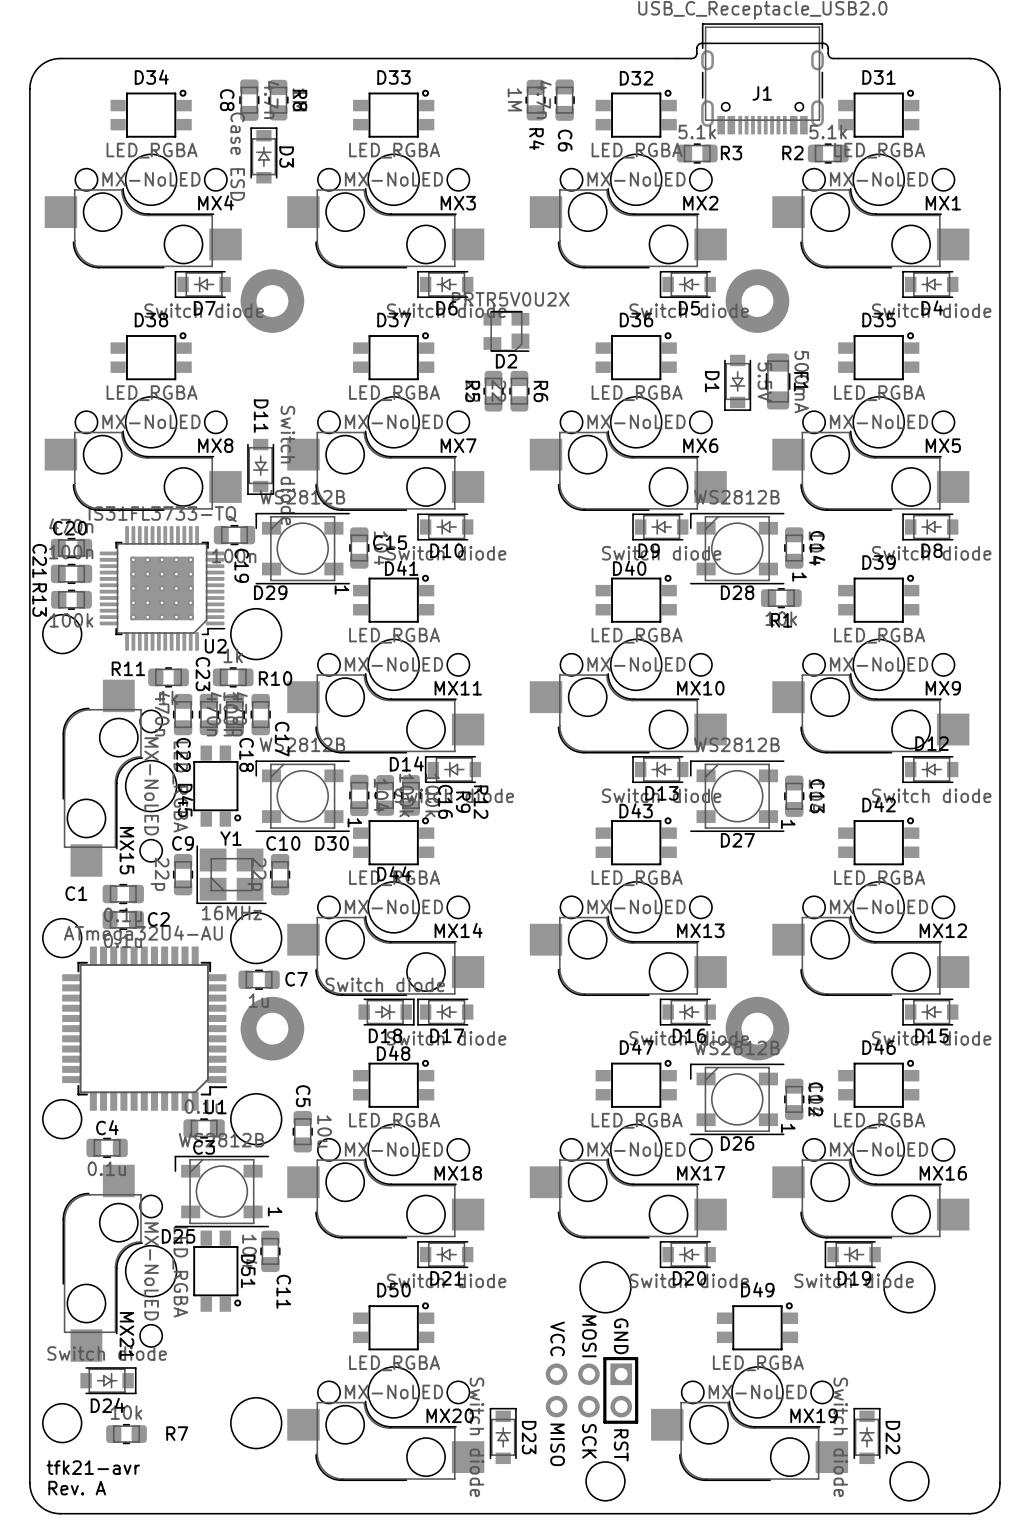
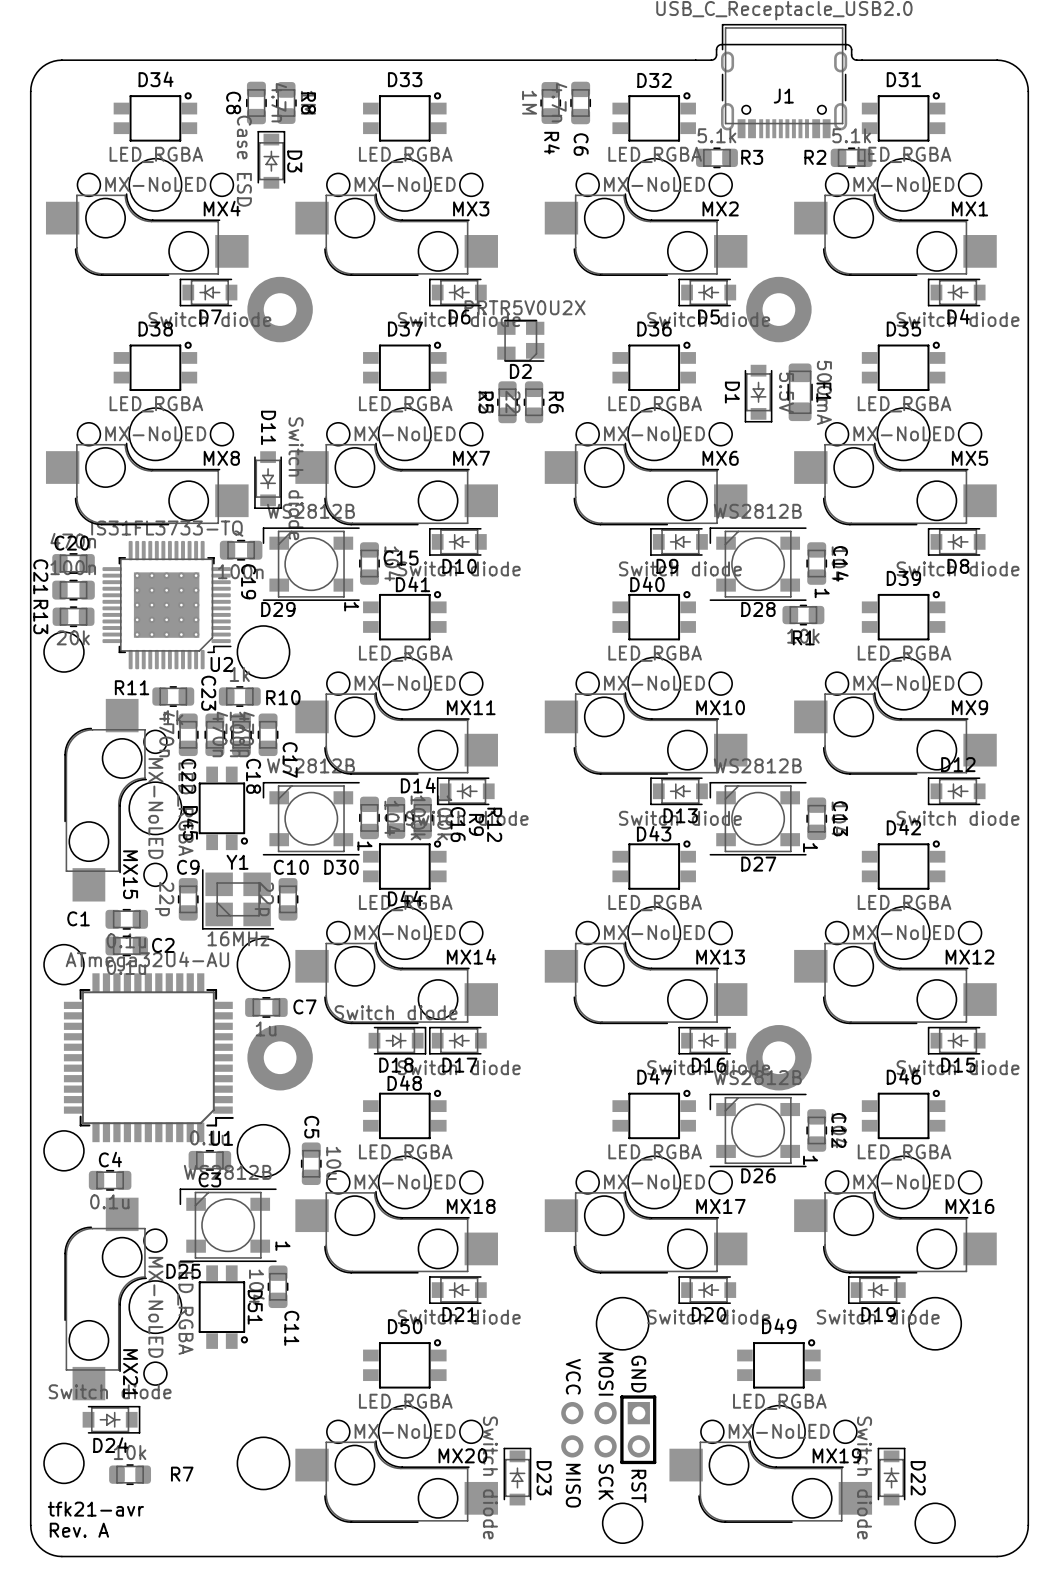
R13 value: 100k (71, 620) -> 20k (73, 637)

